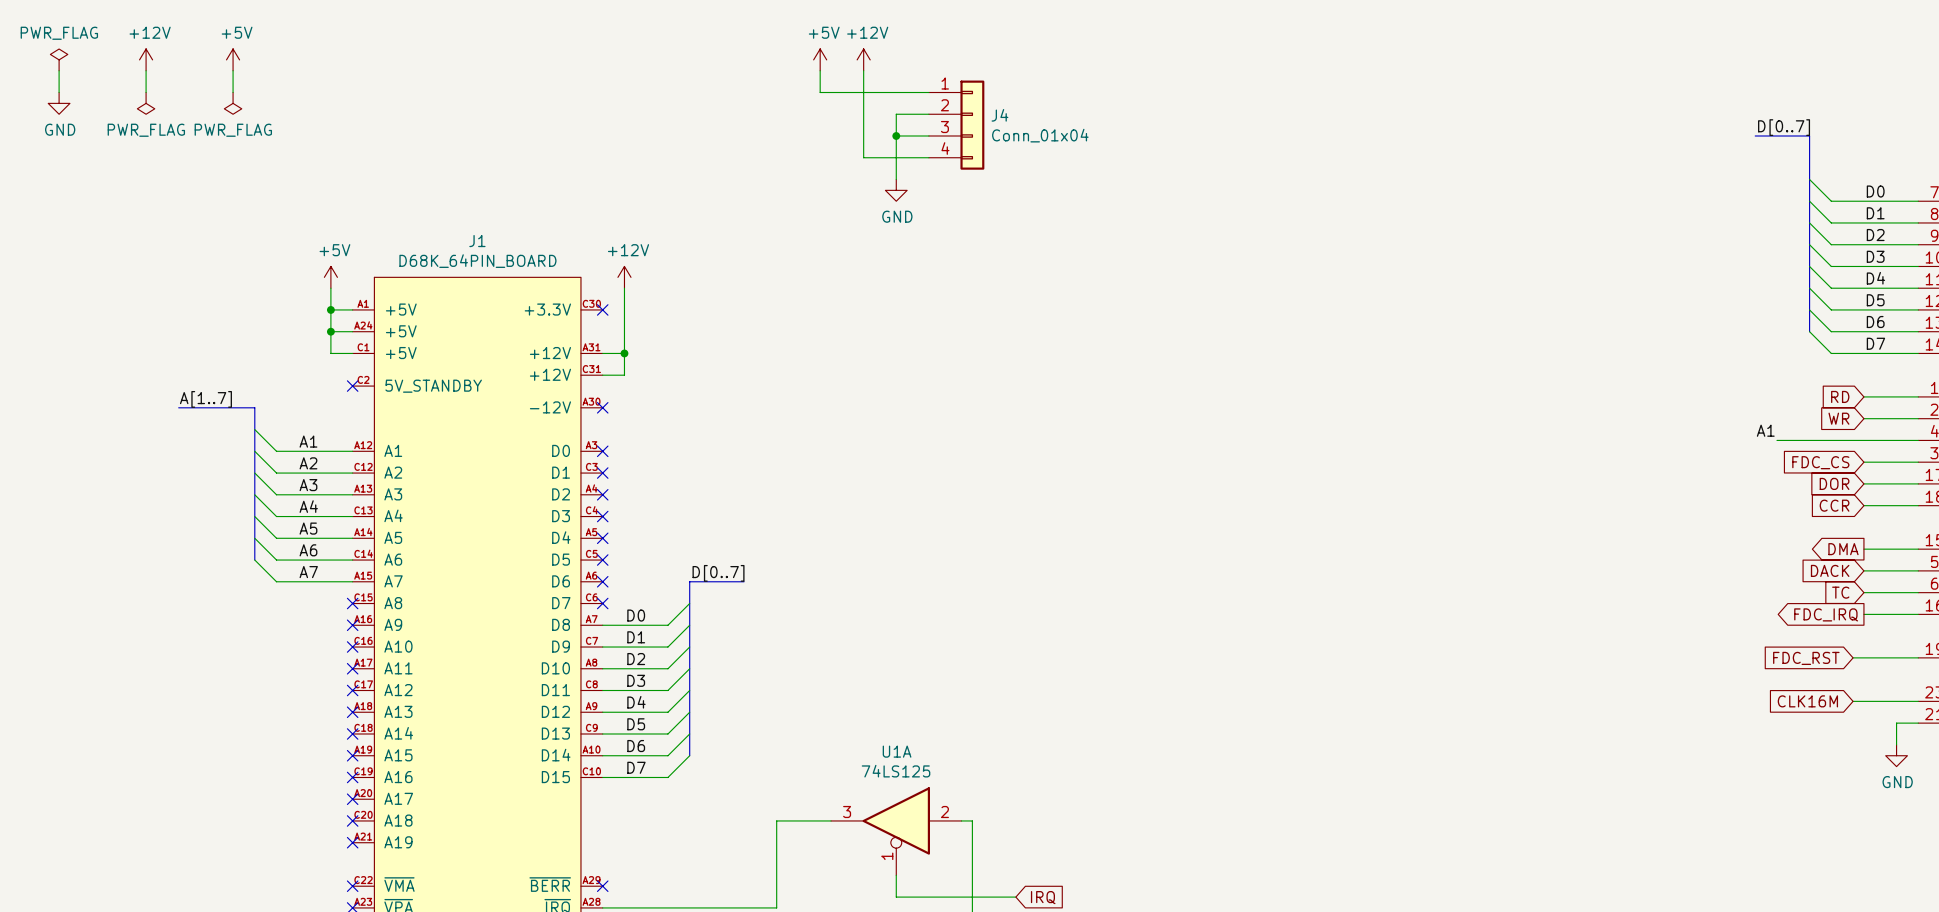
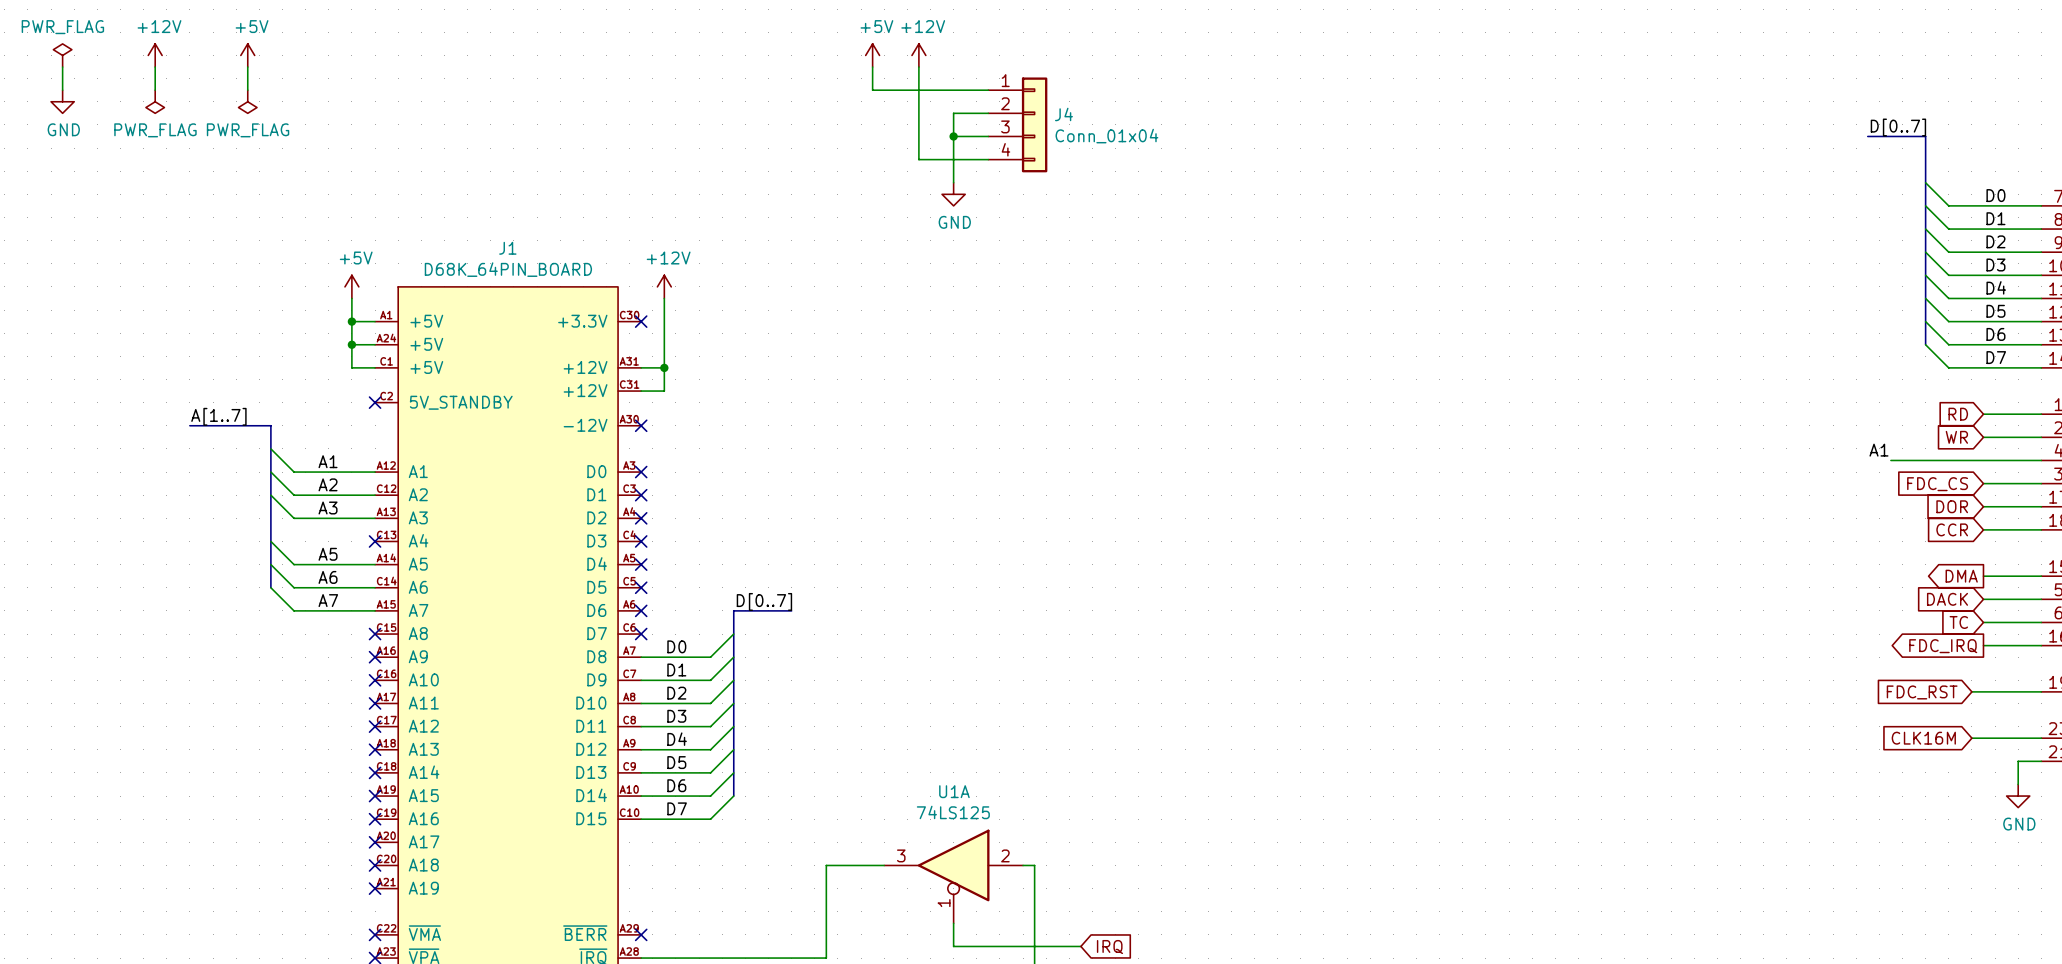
wire: (254, 494) (276, 516) (352, 516) -> none
label: A4 (308, 506) -> none
no-connect mark: none -> (375, 541)

